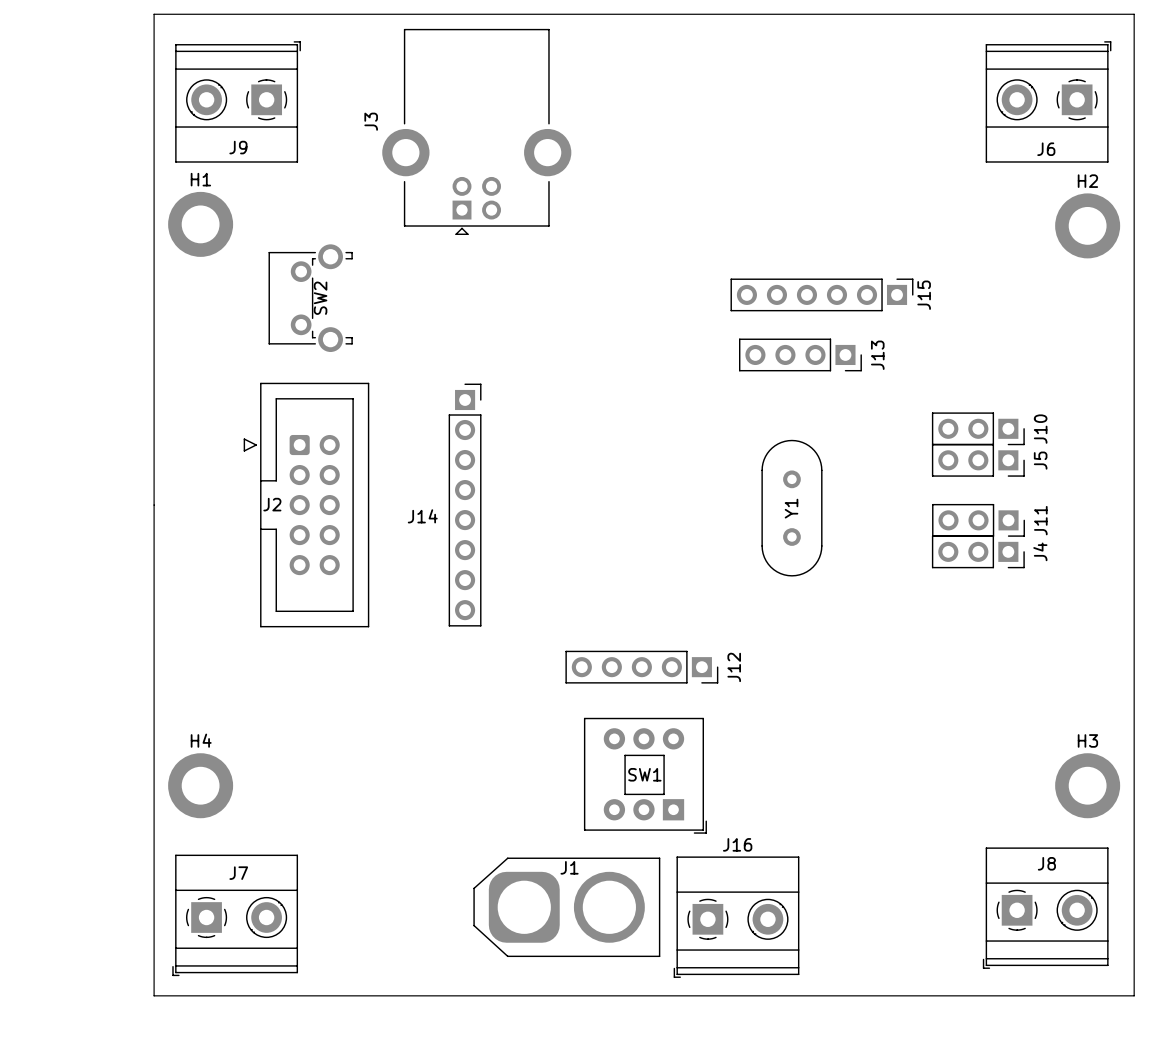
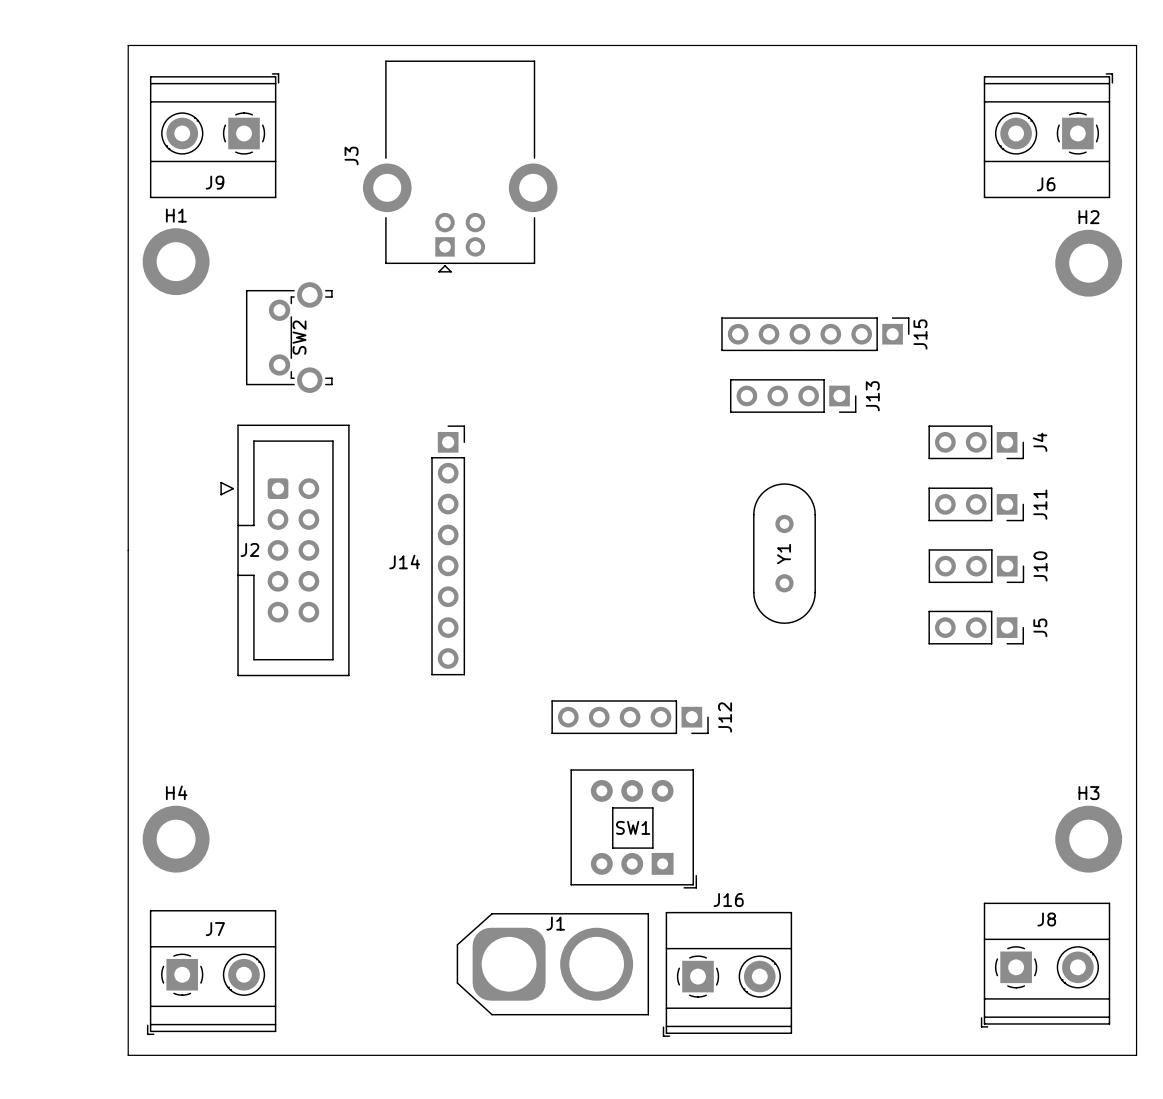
J10: (978, 428) -> none
J5 name: J5 (1040, 460) -> J11 (1040, 504)
J11 name: J11 (1040, 520) -> J10 (1040, 566)
J4 position: (978, 551) -> (976, 442)
J5: none -> (976, 627)

